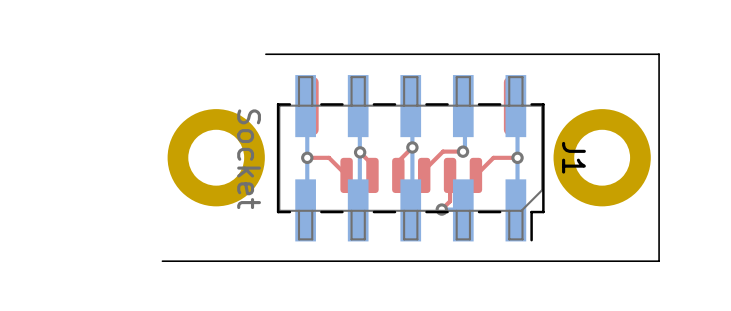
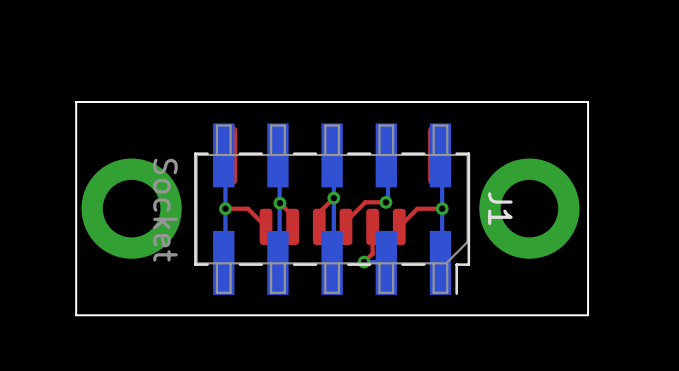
board edge: none -> (182, 101) (76, 101) (76, 315)

